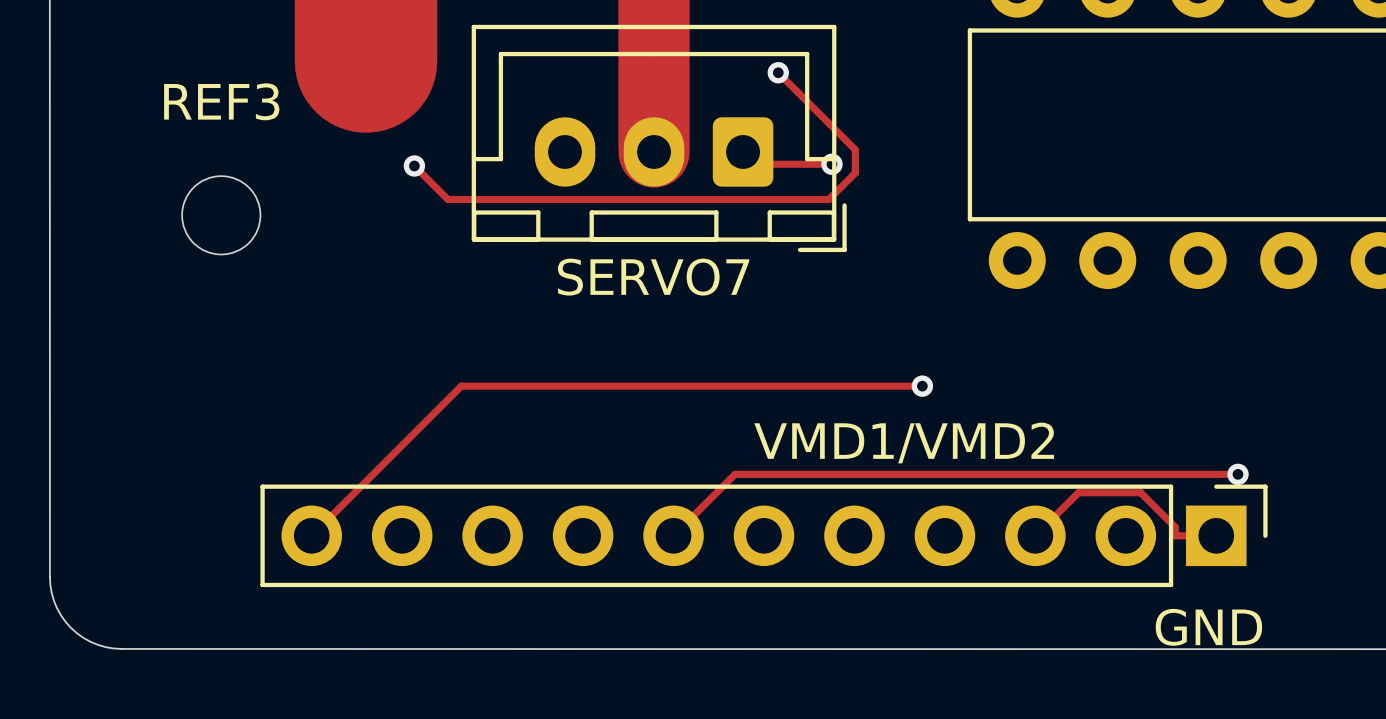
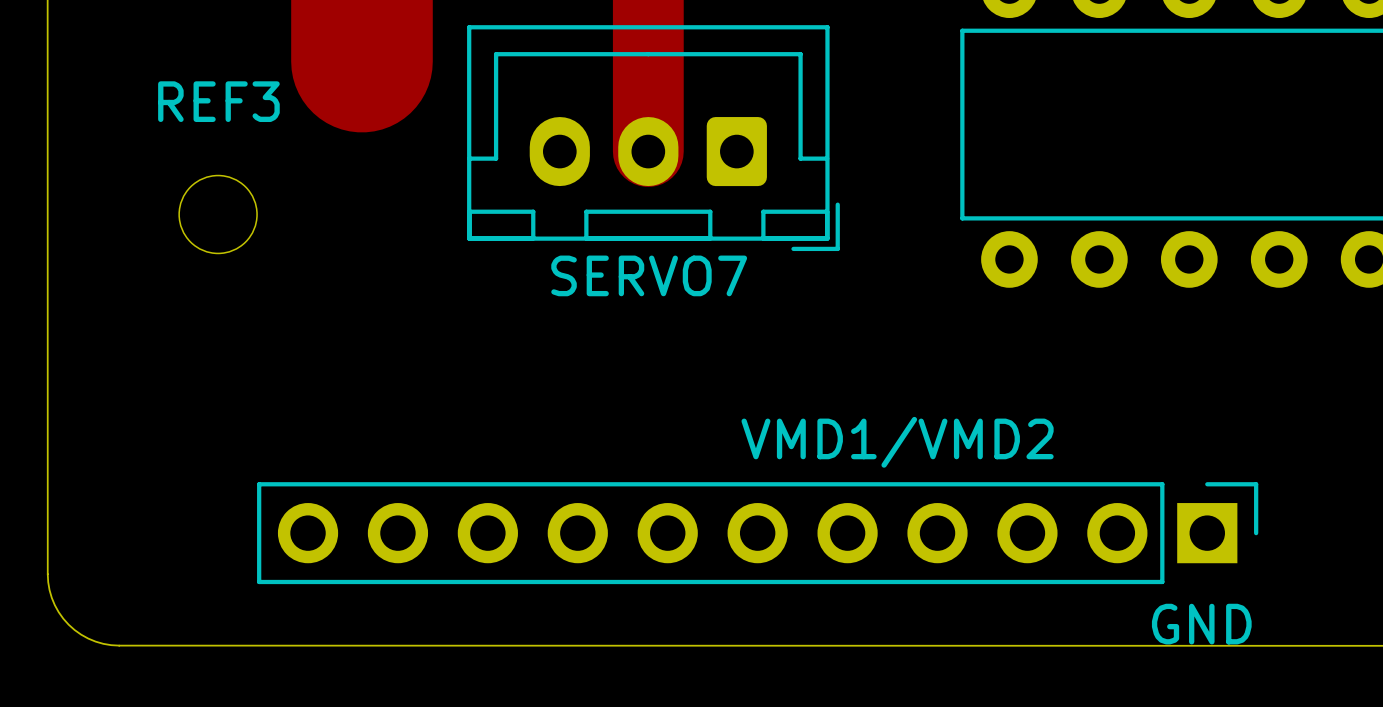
track: (778, 72) (855, 149) (855, 172) (828, 199) (447, 199) (414, 165) -> none
via: (778, 72) -> none
track: (743, 151) (755, 164) (831, 164) -> none
via: (831, 164) -> none
via: (414, 165) -> none
track: (922, 386) (461, 386) (311, 535) -> none
via: (922, 386) -> none
track: (1237, 474) (735, 474) (673, 535) -> none
via: (1237, 474) -> none
track: (1035, 535) (1078, 492) (1140, 492) (1175, 527) (1175, 535) (1216, 535) -> none

